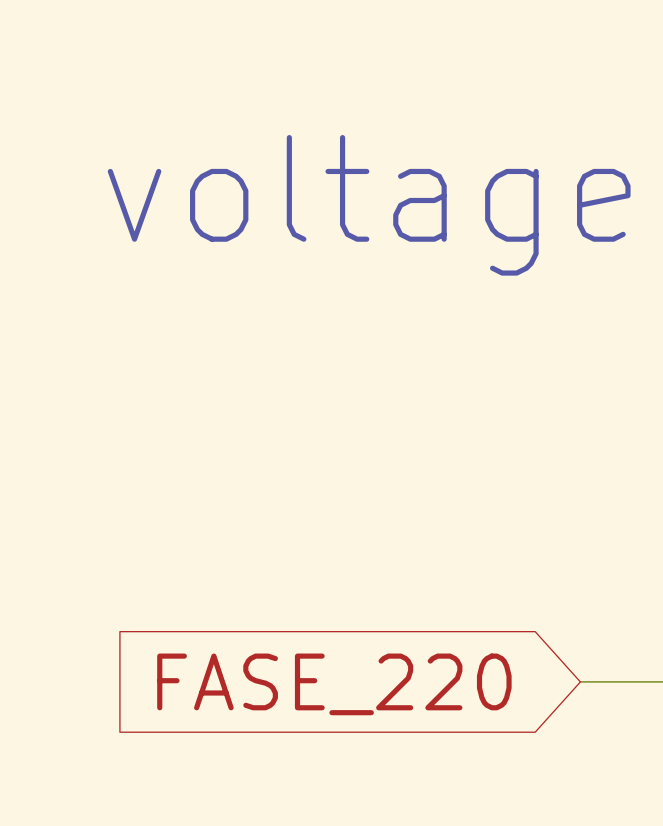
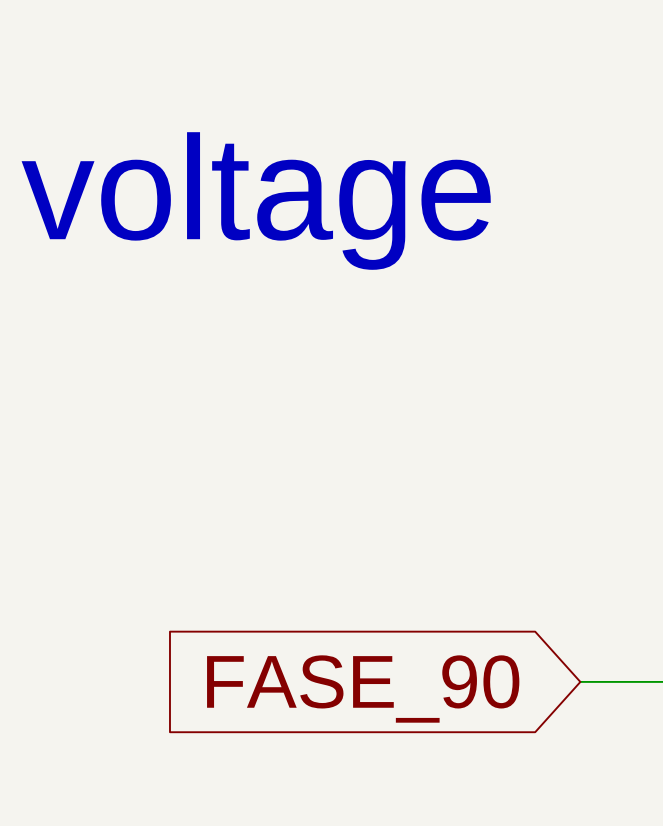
global label: FASE_220 (334, 684) -> FASE_90 (363, 689)

